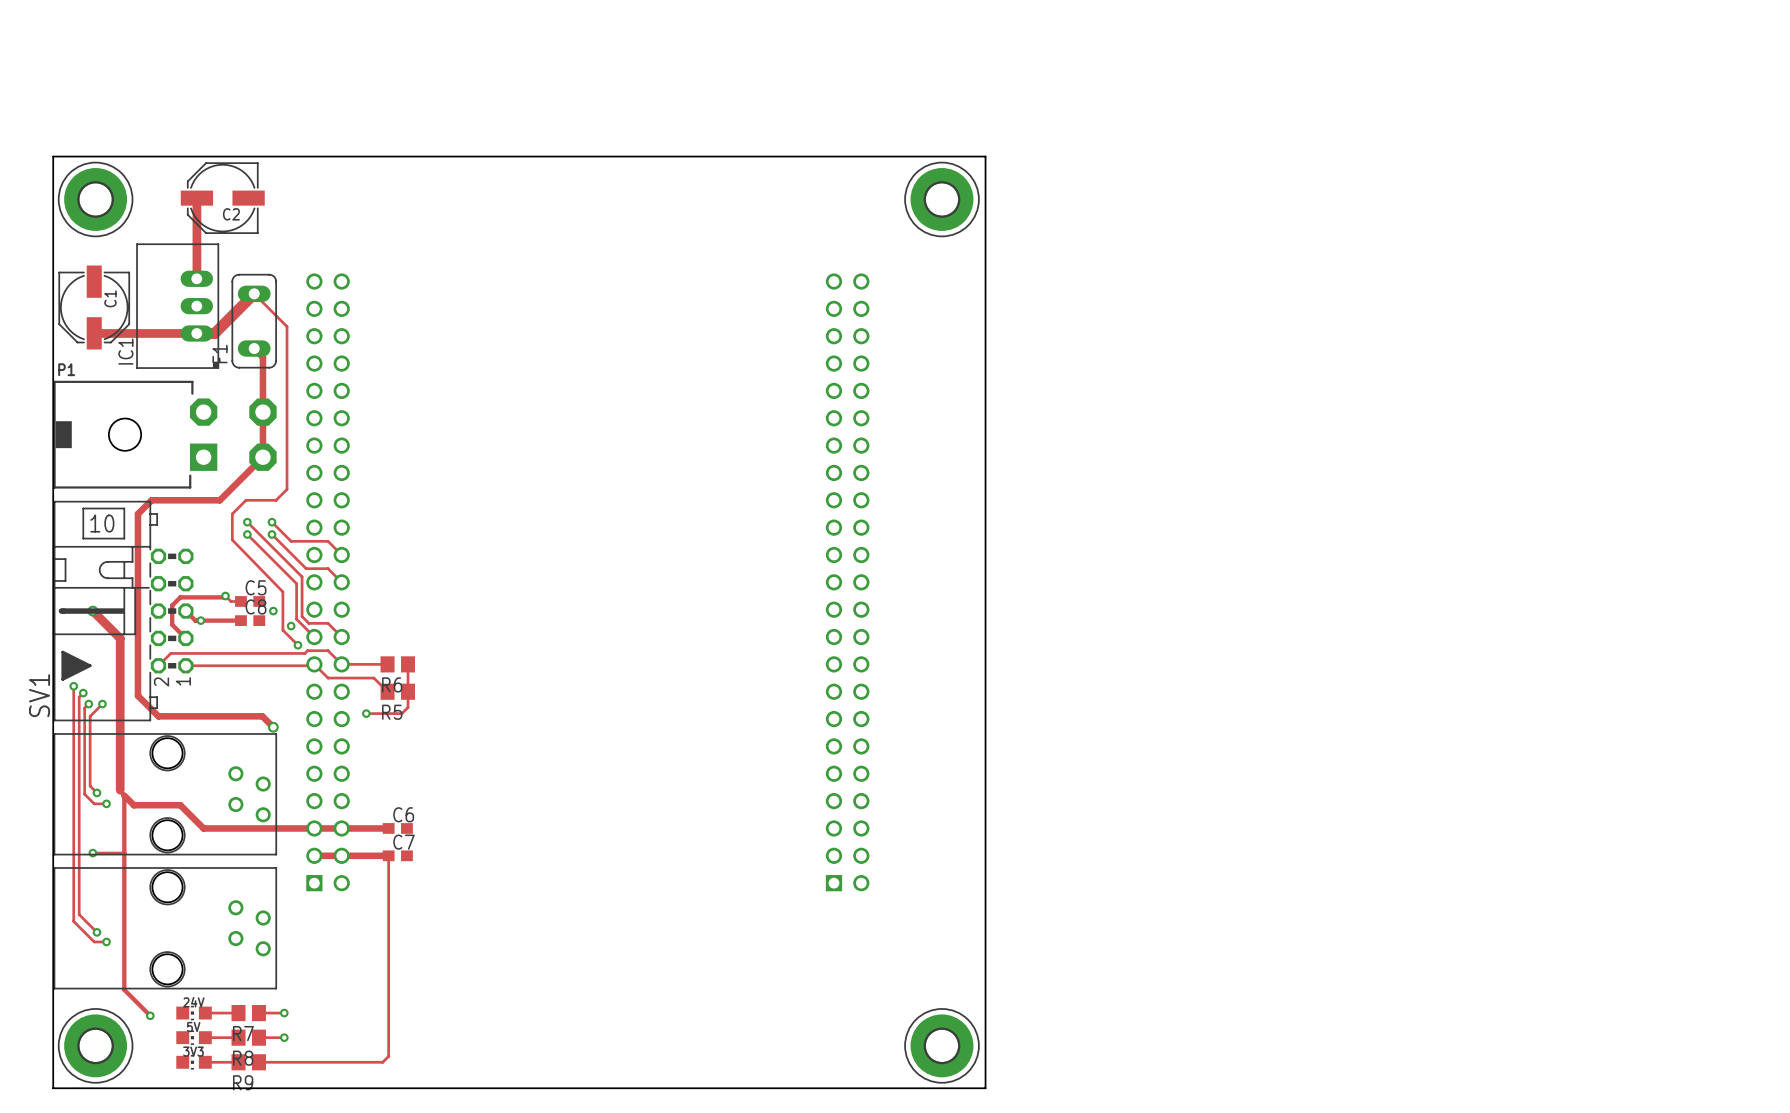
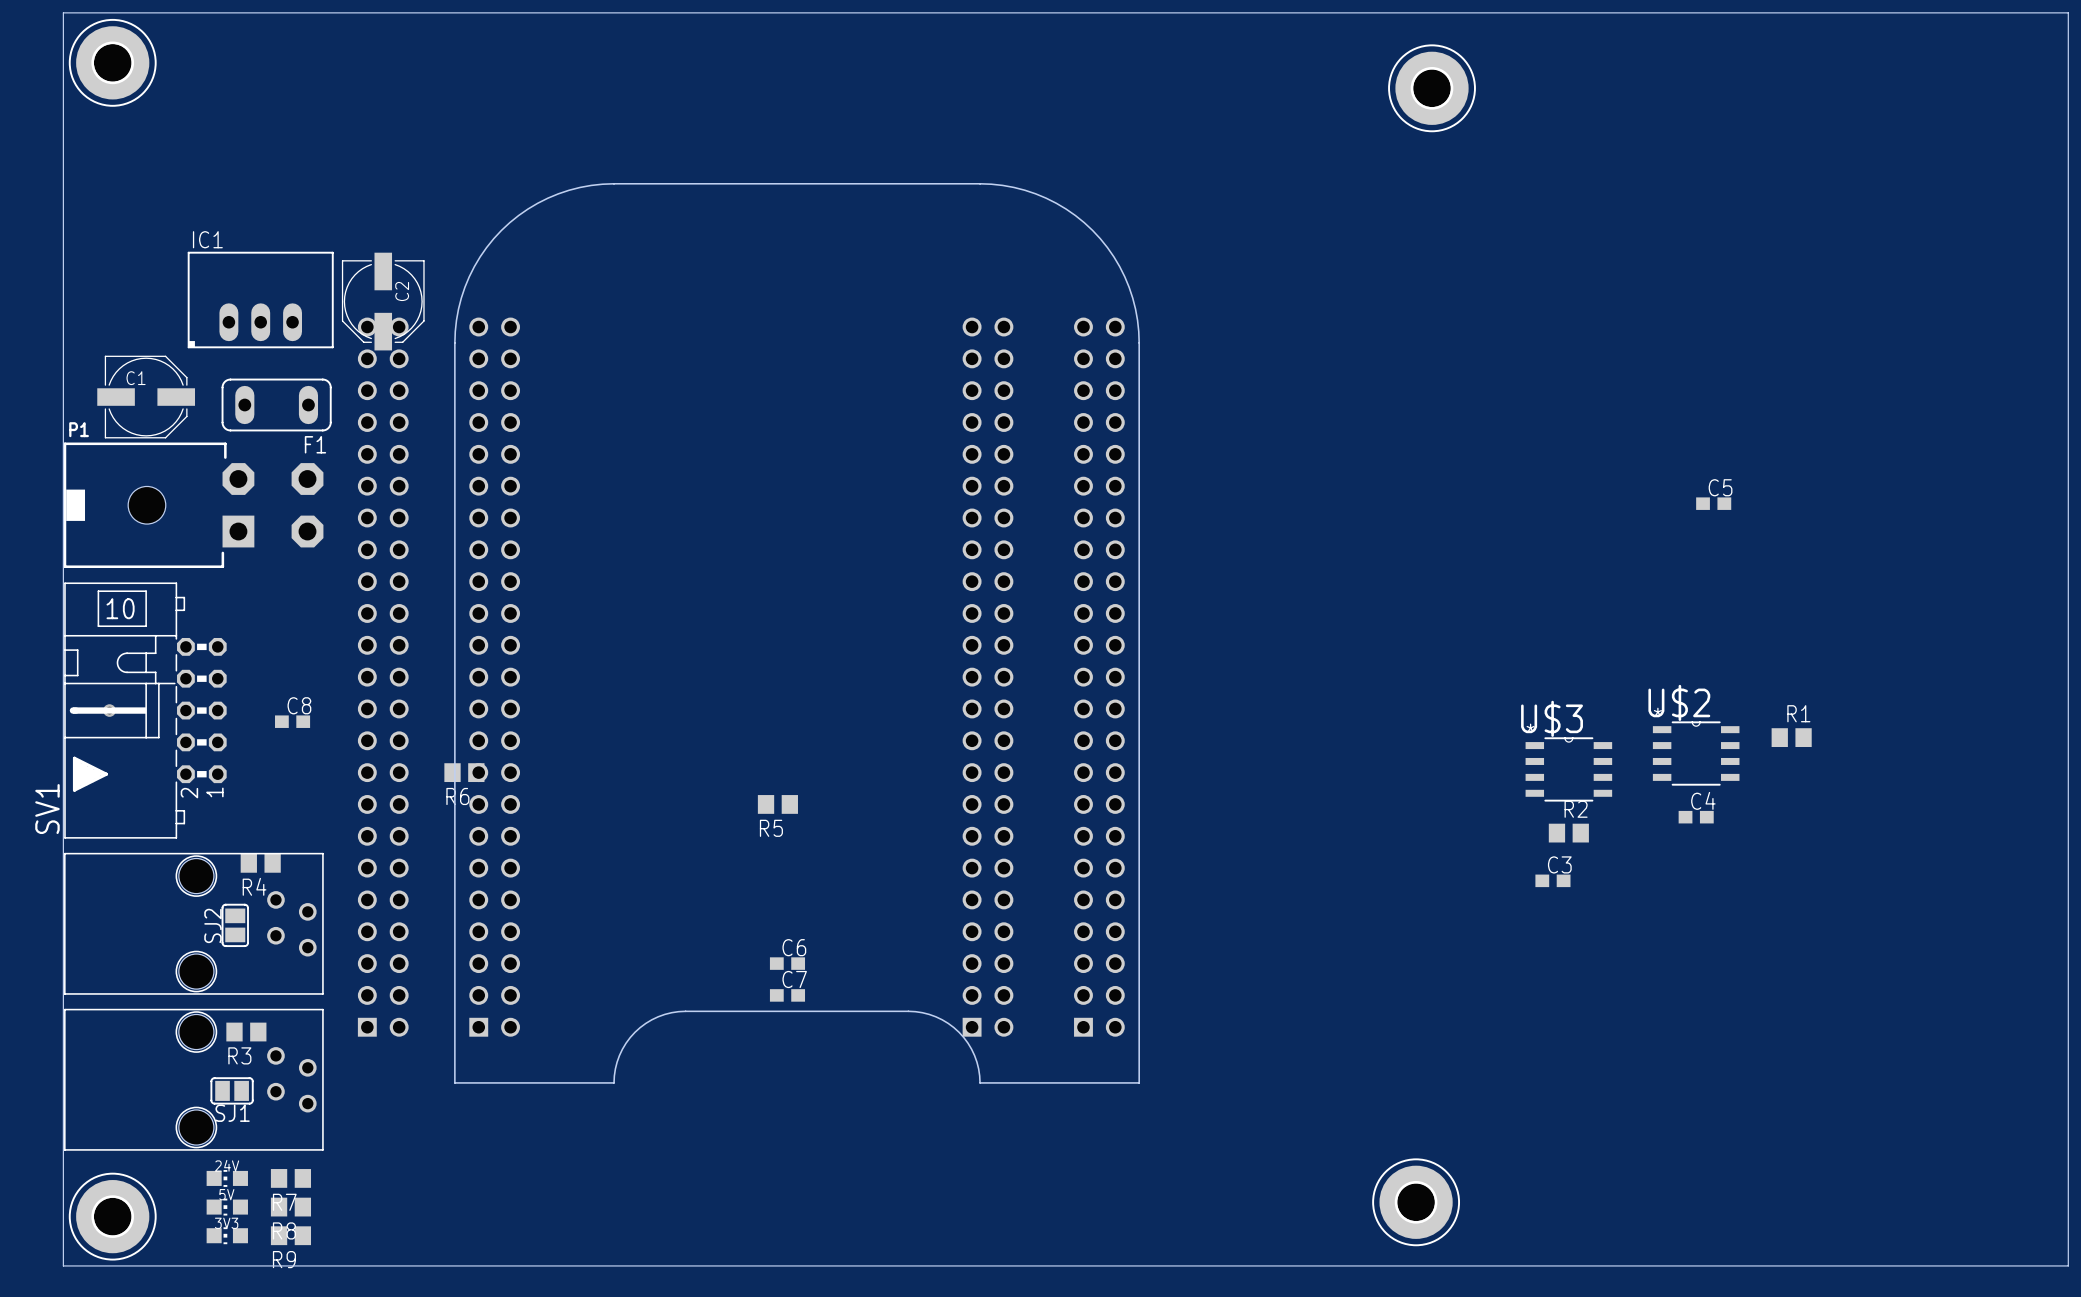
part: none -> (1432, 88)
board edge: (53, 156) (985, 156) (985, 1088) -> (63, 181) (63, 12) (2068, 12) (2068, 1265) (1148, 1265)
track: (196, 198) (196, 278) -> none
C2 rotation: 0° (222, 198) -> 90° counterclockwise (383, 301)
C2 position: (222, 198) -> (383, 301)
part position: (95, 199) -> (112, 62)
part: (941, 199) -> none
IC1 rotation: 0° (177, 306) -> 90° clockwise (260, 300)
C1 rotation: 0° (94, 307) -> 90° counterclockwise (146, 397)
F1 rotation: 0° (254, 321) -> 90° clockwise (276, 405)
track: (94, 333) (214, 333) -> none
track: (214, 333) (254, 293) (287, 326) (287, 489) (276, 500) (246, 500) (232, 513) (232, 539) (282, 591) (282, 630) (297, 645) -> none
track: (254, 348) (262, 357) (262, 457) (219, 500) (151, 500) (137, 513) (137, 695) (158, 716) (262, 716) (273, 727) -> none
F1 name position: F1 (220, 353) -> F1 (315, 444)
track: (247, 522) (302, 576) (302, 616) (308, 623) (328, 623) (341, 637) -> none
via: (247, 522) -> none
track: (271, 522) (291, 541) (328, 541) (341, 554) -> none
via: (271, 522) -> none
track: (247, 534) (296, 583) (296, 619) (314, 637) -> none
via: (247, 534) -> none
track: (271, 534) (306, 568) (328, 568) (341, 582) -> none
via: (271, 534) -> none
part: none -> (797, 633)
via: (225, 596) -> none
track: (240, 601) (230, 601) (225, 596) (180, 597) (172, 605) (172, 624) (185, 638) -> none
C5 position: (250, 601) -> (1713, 503)
track: (92, 611) (120, 638) (120, 790) (124, 795) -> none
track: (185, 611) (195, 620) (240, 620) -> none
via: (273, 611) -> none
via: (200, 620) -> none
via: (291, 626) -> none
R1: none -> (1791, 737)
via: (297, 645) -> none
U$2: none -> (1696, 753)
U$3: none -> (1568, 769)
track: (387, 664) (341, 664) (328, 650) (307, 650) (304, 653) (170, 653) (158, 665) -> none
track: (408, 664) (408, 707) (401, 713) (366, 713) -> none
track: (185, 665) (314, 664) (328, 678) (373, 678) (387, 691) -> none
track: (73, 686) (73, 921) (94, 941) (106, 941) -> none
via: (73, 686) -> none
R5 position: (397, 691) -> (777, 804)
track: (83, 693) (79, 697) (79, 914) (96, 932) -> none
via: (83, 693) -> none
C4: none -> (1696, 817)
track: (88, 704) (84, 708) (84, 794) (94, 803) (106, 803) -> none
via: (88, 704) -> none
track: (102, 704) (90, 716) (90, 786) (96, 792) -> none
via: (102, 704) -> none
via: (366, 713) -> none
R2: none -> (1568, 833)
via: (273, 727) -> none
R4: none -> (260, 863)
C3: none -> (1552, 880)
via: (96, 792) -> none
track: (124, 795) (133, 805) (180, 805) (203, 828) (388, 828) -> none
track: (124, 795) (124, 989) (150, 1015) -> none
SJ2: none -> (235, 925)
via: (106, 803) -> none
C6 position: (397, 828) -> (787, 963)
track: (92, 853) (124, 853) -> none
via: (92, 853) -> none
track: (314, 855) (388, 855) (388, 1056) (382, 1062) (258, 1062) -> none
C7 position: (397, 855) -> (787, 995)
R3: none -> (246, 1032)
via: (96, 932) -> none
SJ1: none -> (232, 1090)
via: (106, 941) -> none
track: (205, 1013) (238, 1013) -> none
track: (258, 1013) (284, 1013) -> none
via: (284, 1013) -> none
via: (150, 1015) -> none
part: none -> (1416, 1202)
track: (205, 1037) (238, 1037) -> none
track: (258, 1037) (284, 1037) -> none
via: (284, 1037) -> none
part: (941, 1045) -> none
track: (205, 1062) (238, 1062) -> none

